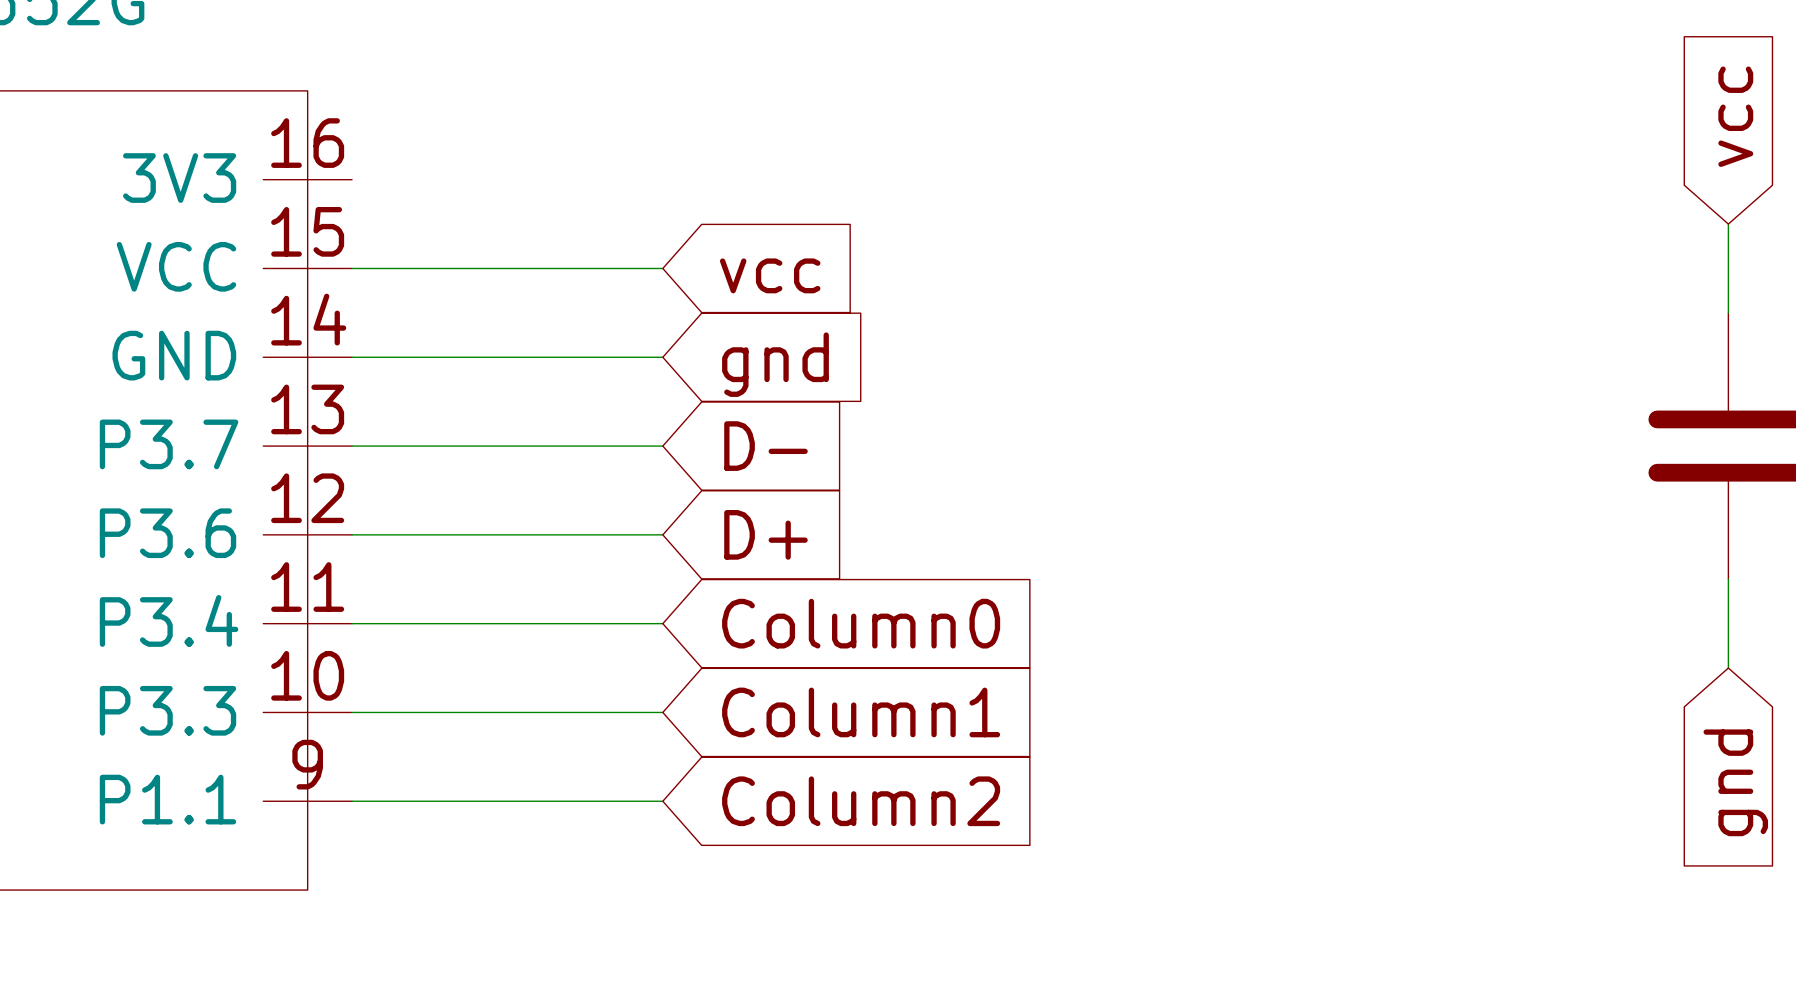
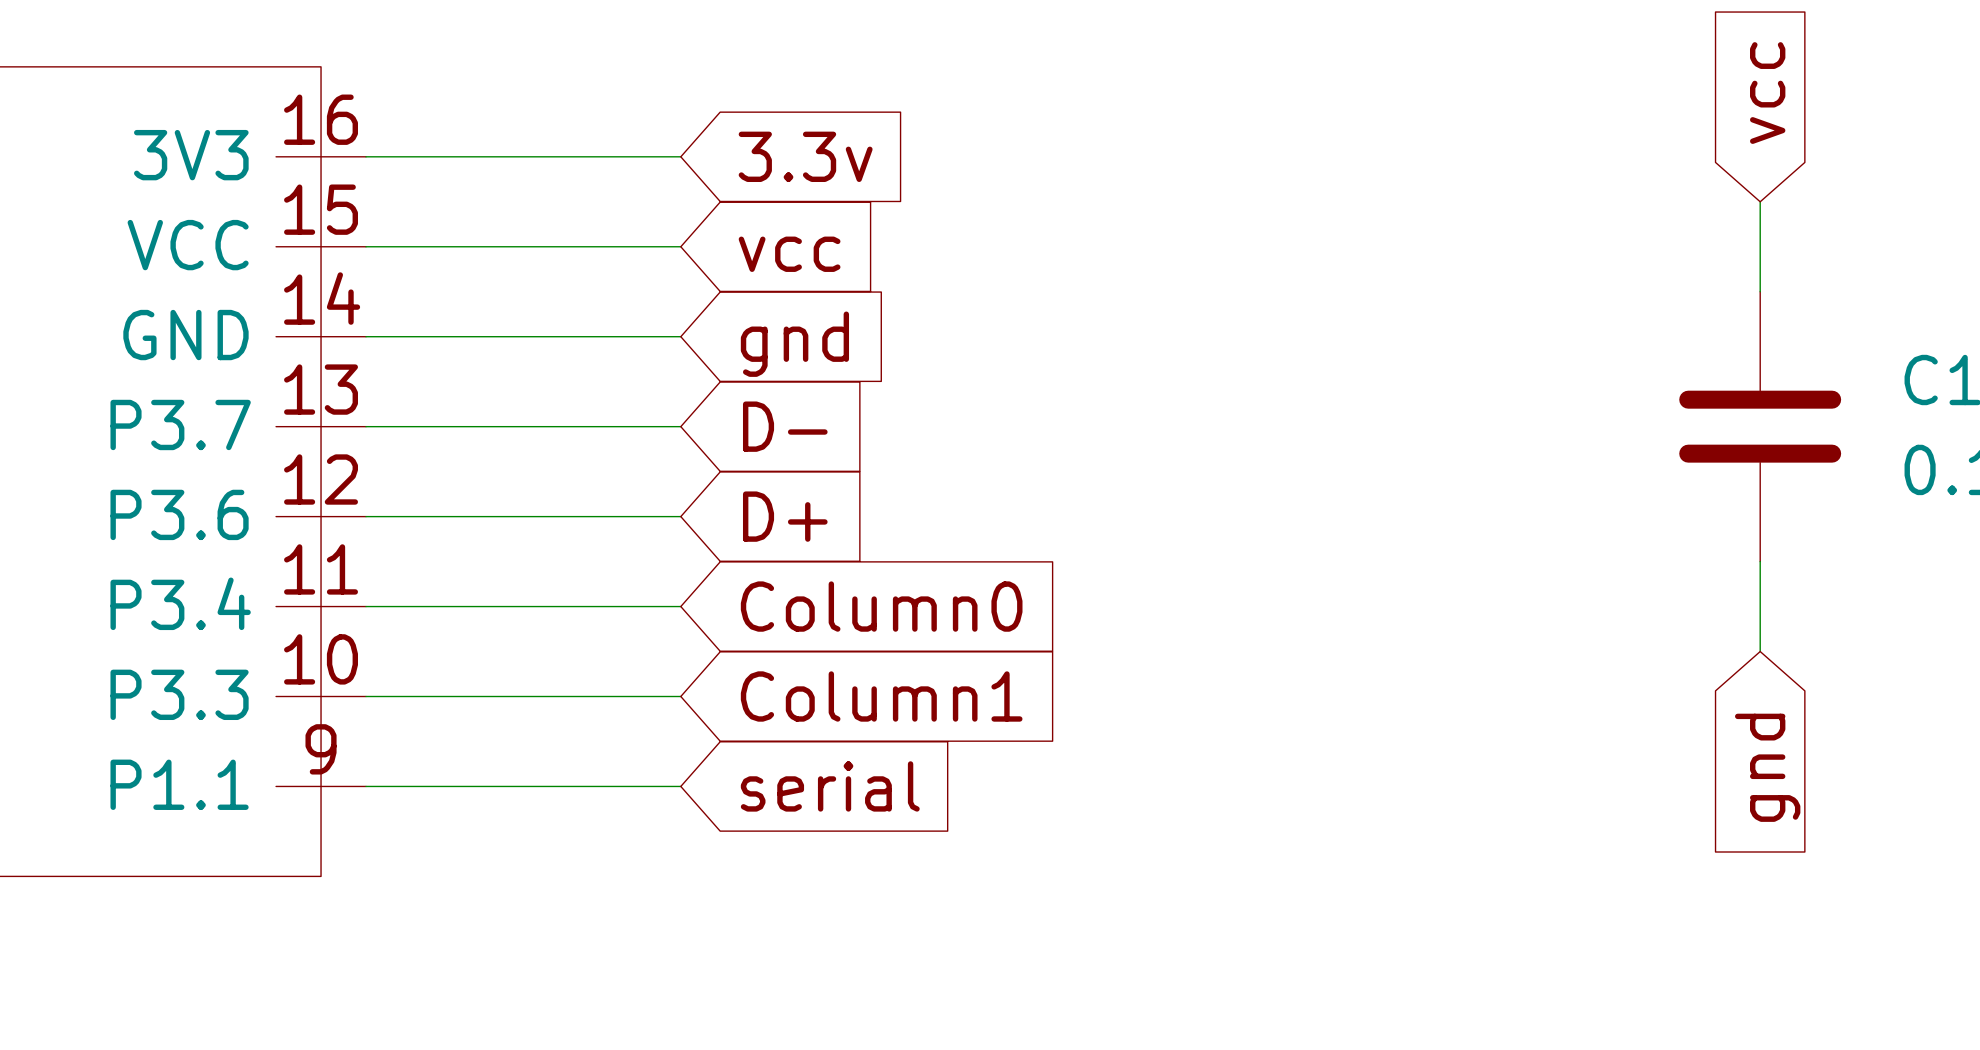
wire: none -> (366, 156) (680, 156)
global label: none -> 3.3v (805, 156)
global label: Column2 (861, 801) -> serial (830, 786)

